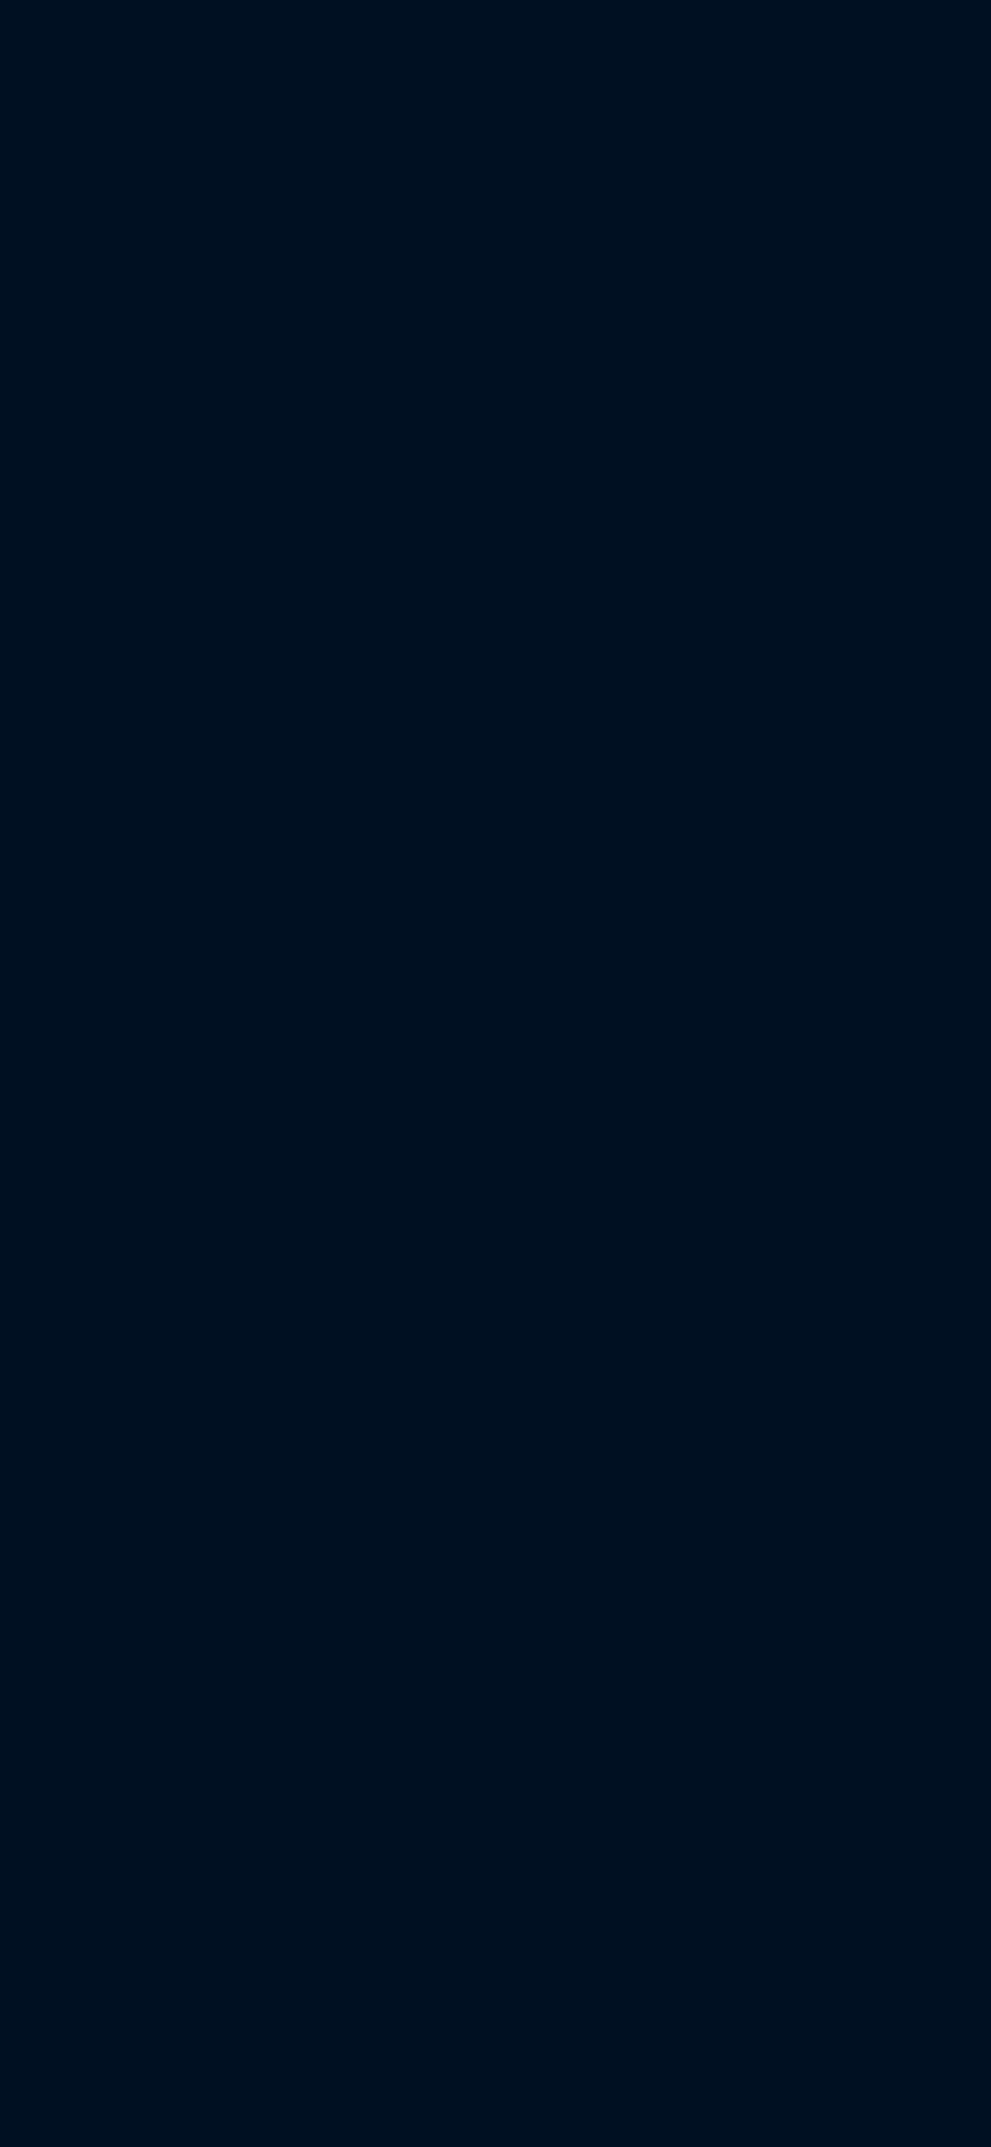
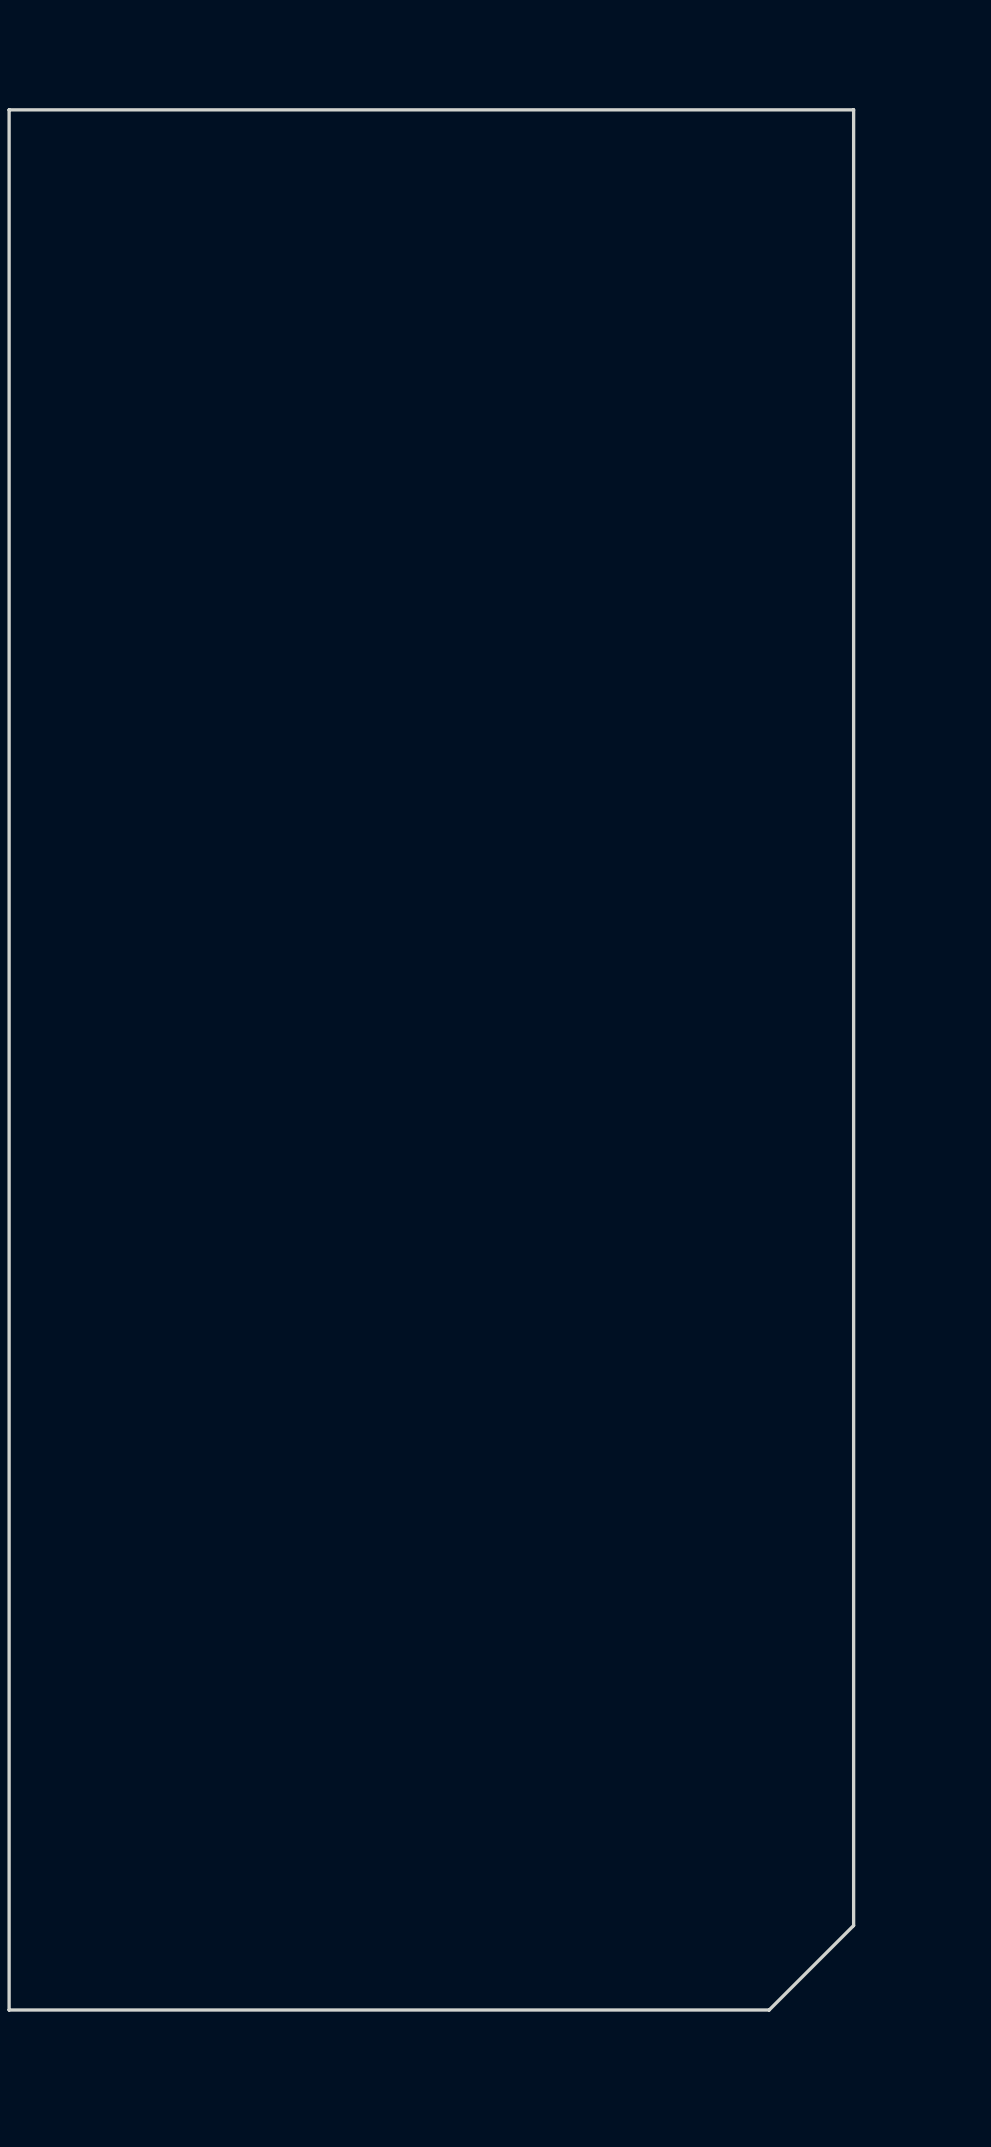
board edge: none -> (9, 109) (853, 109) (853, 1925) (769, 2010) (9, 2010) (9, 109)

